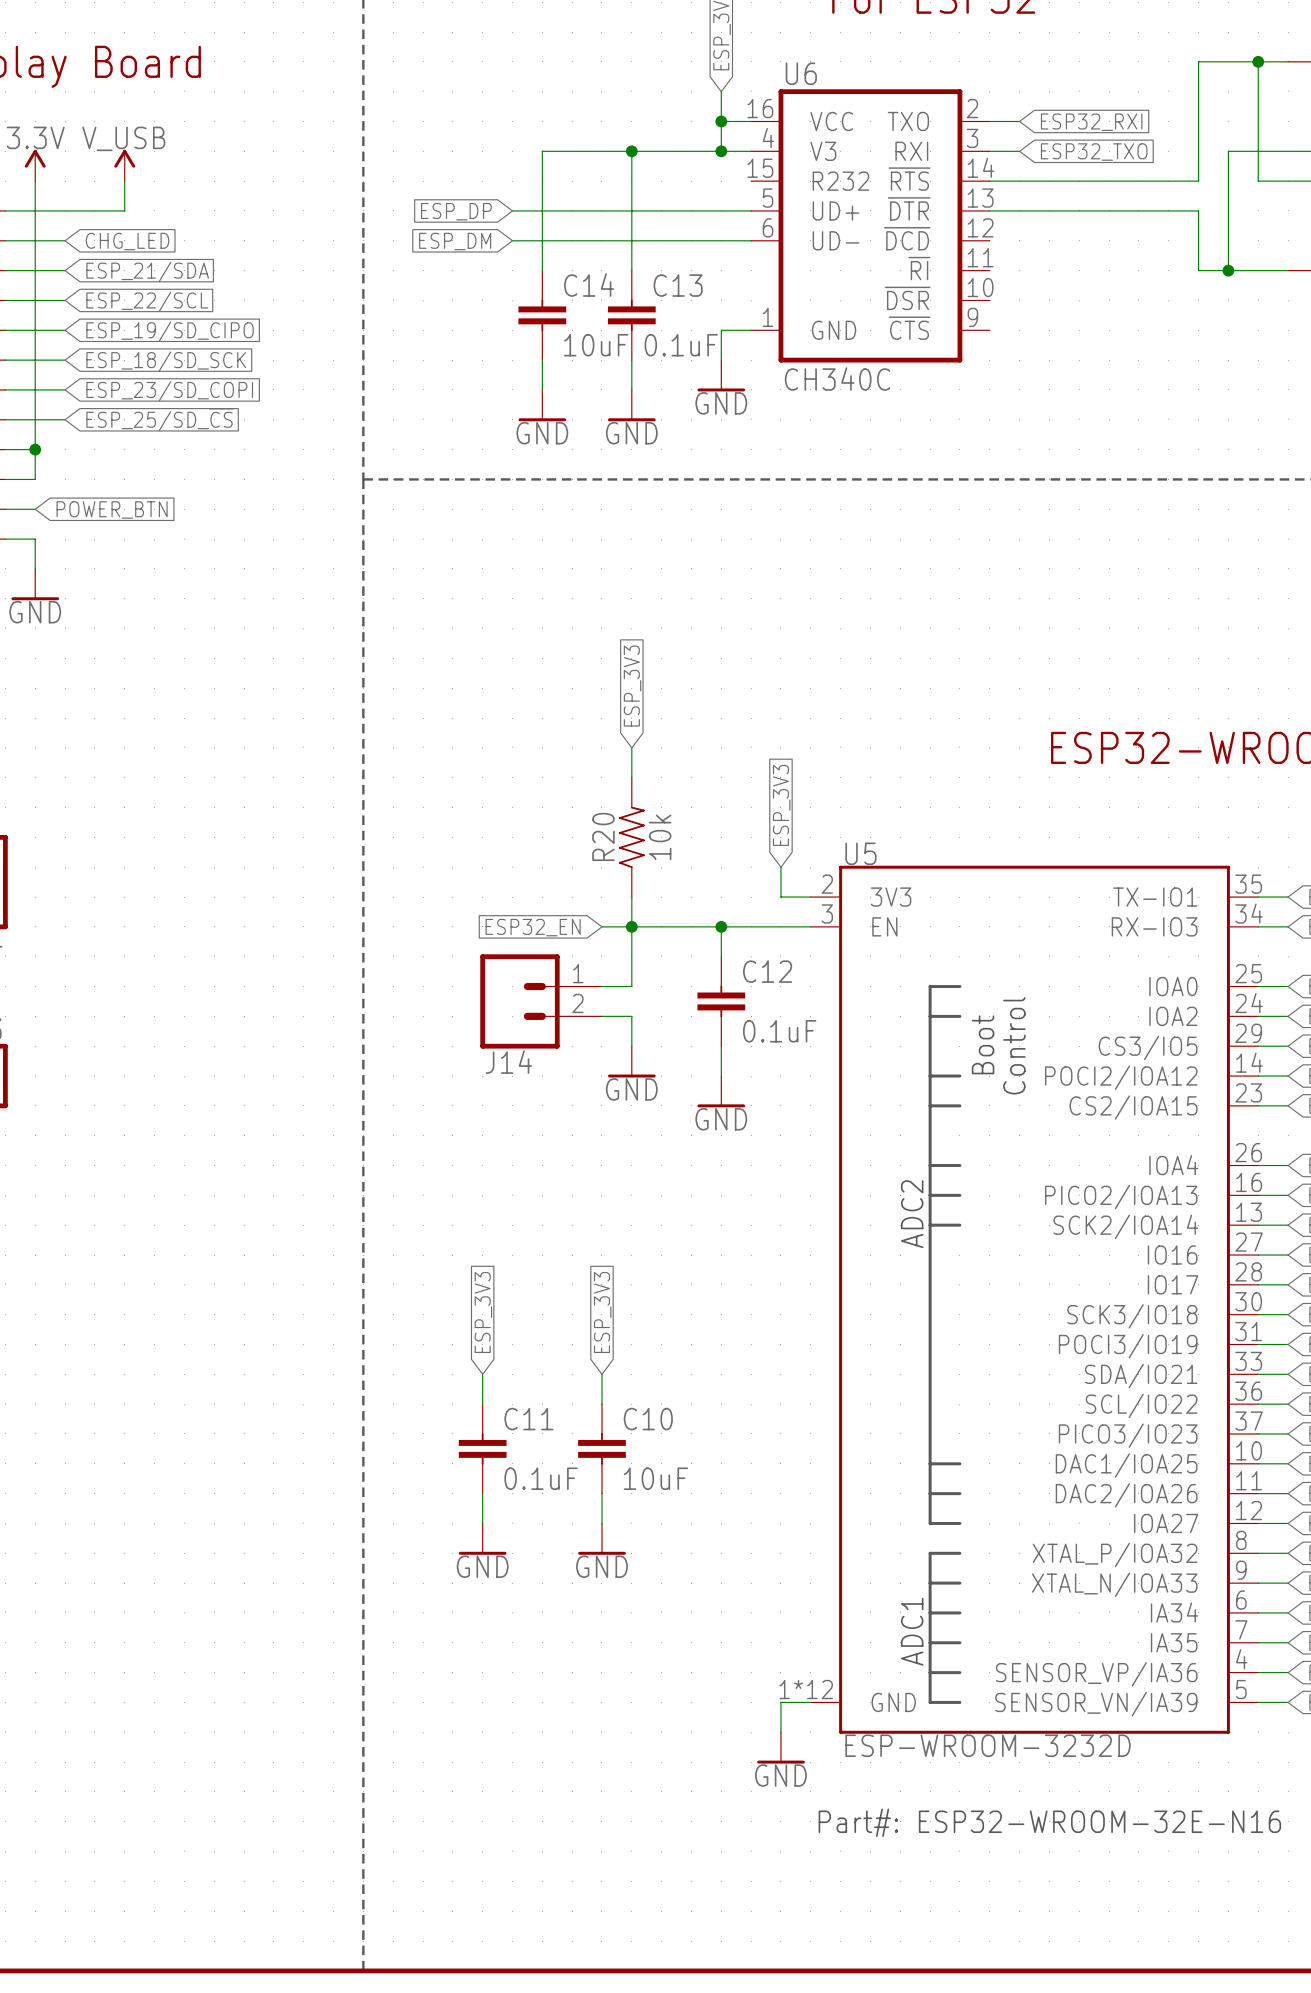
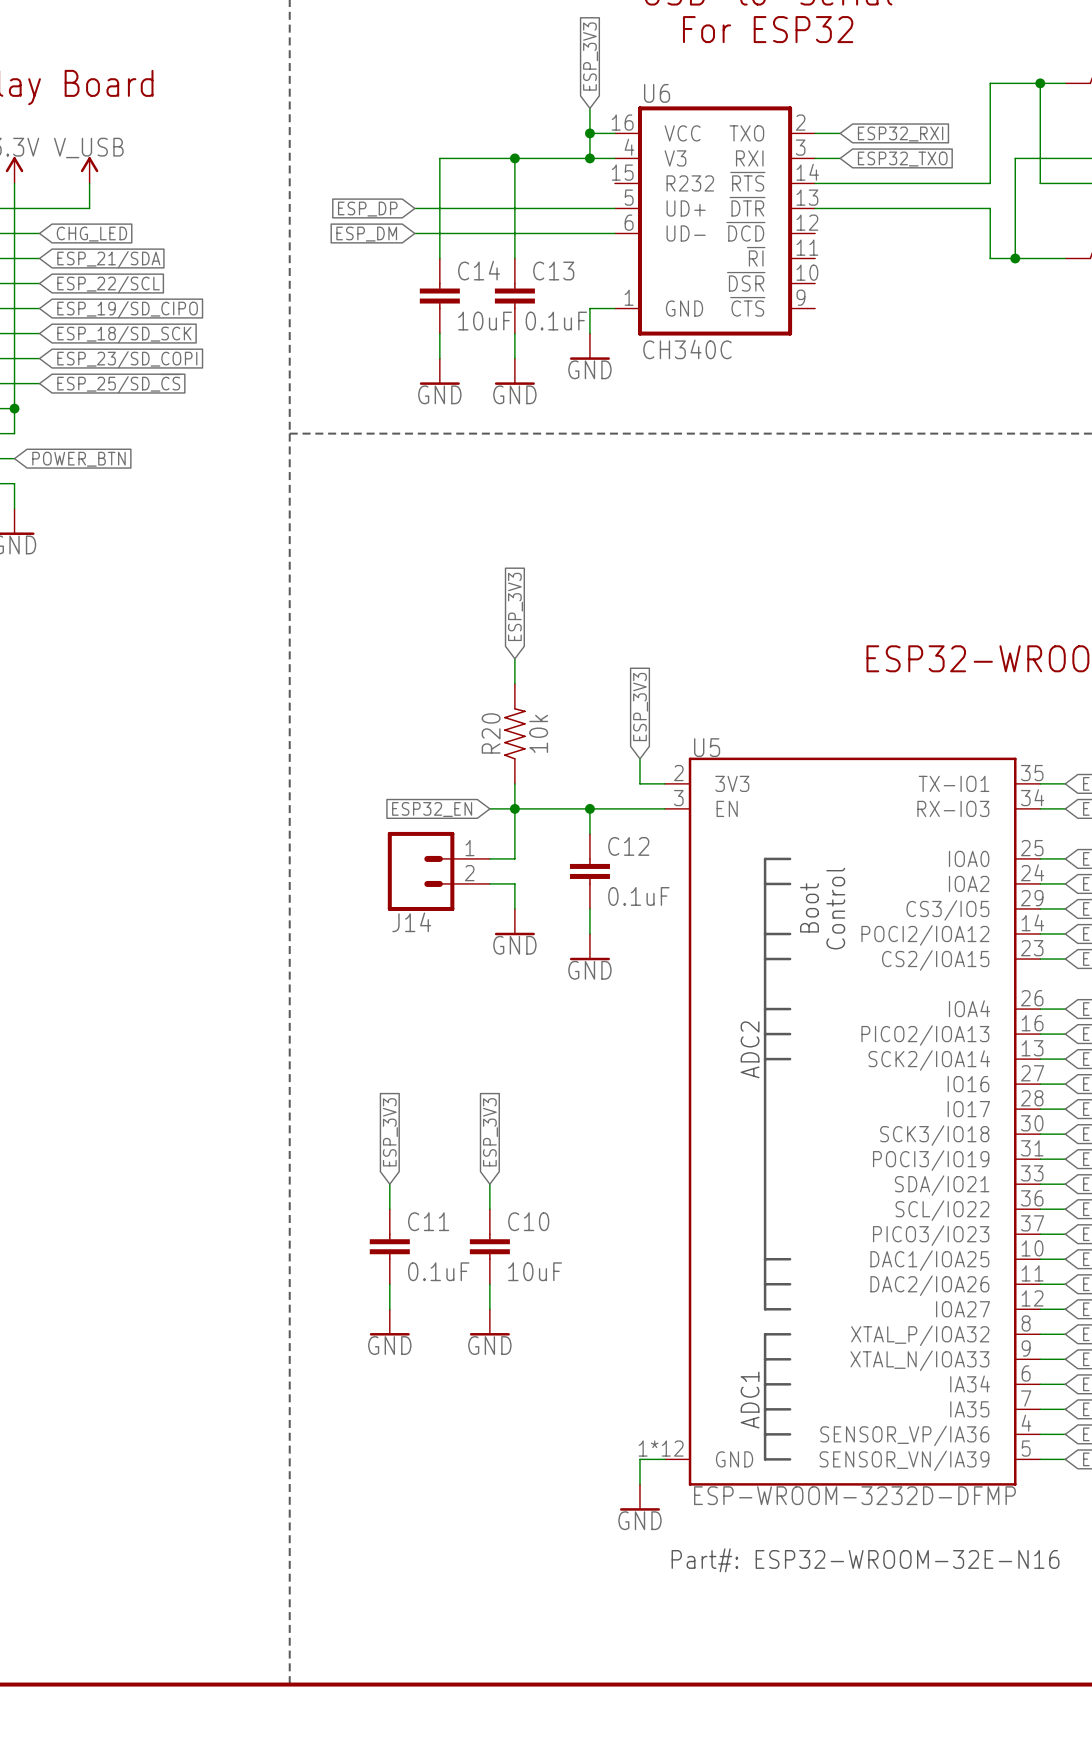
U5 value: ESP-WROOM-3232D (988, 1745) -> ESP-WROOM-3232D-DFMP (854, 1495)

